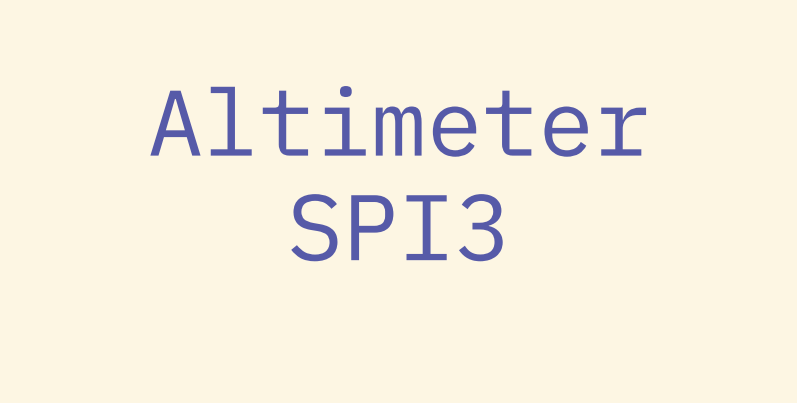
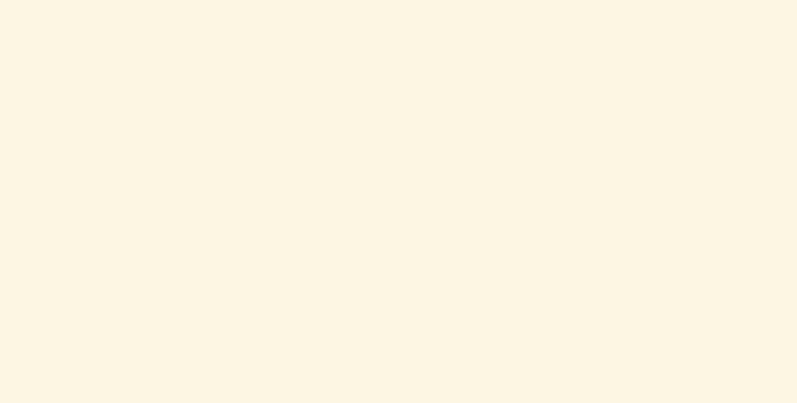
text: Altimeter (398, 121) -> none
text: SPI3 (396, 227) -> none

